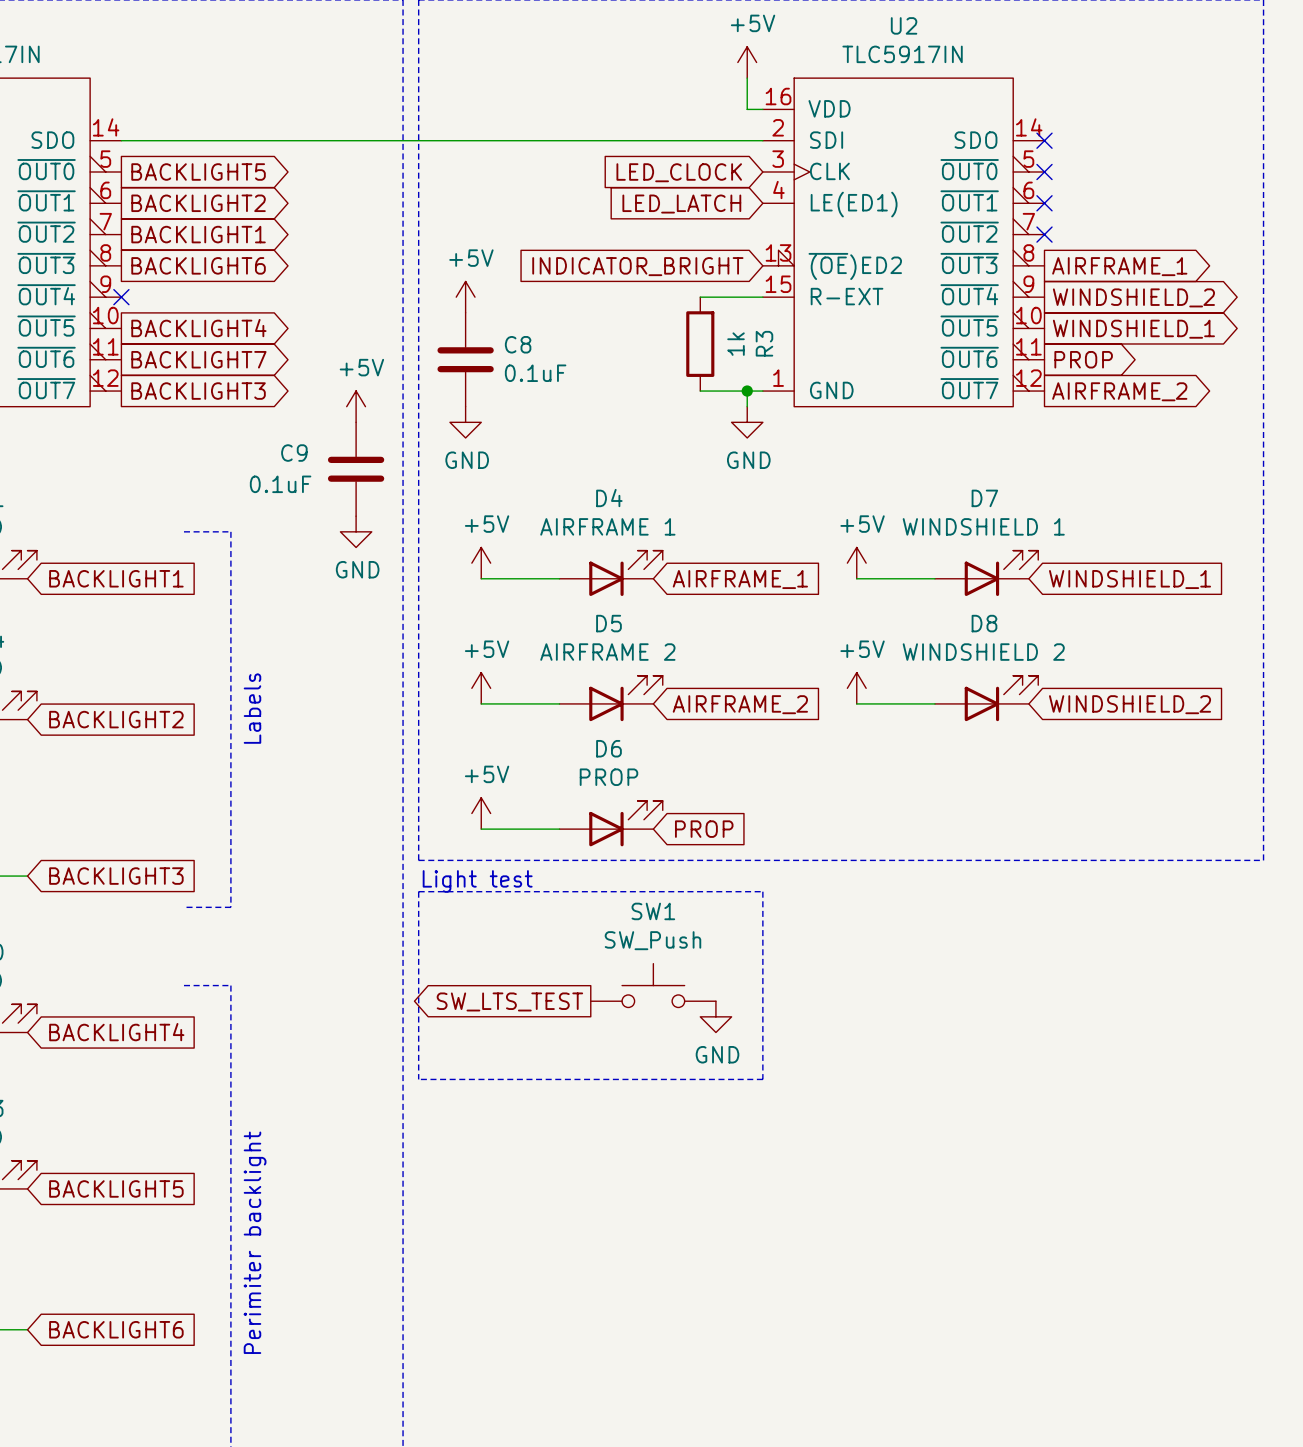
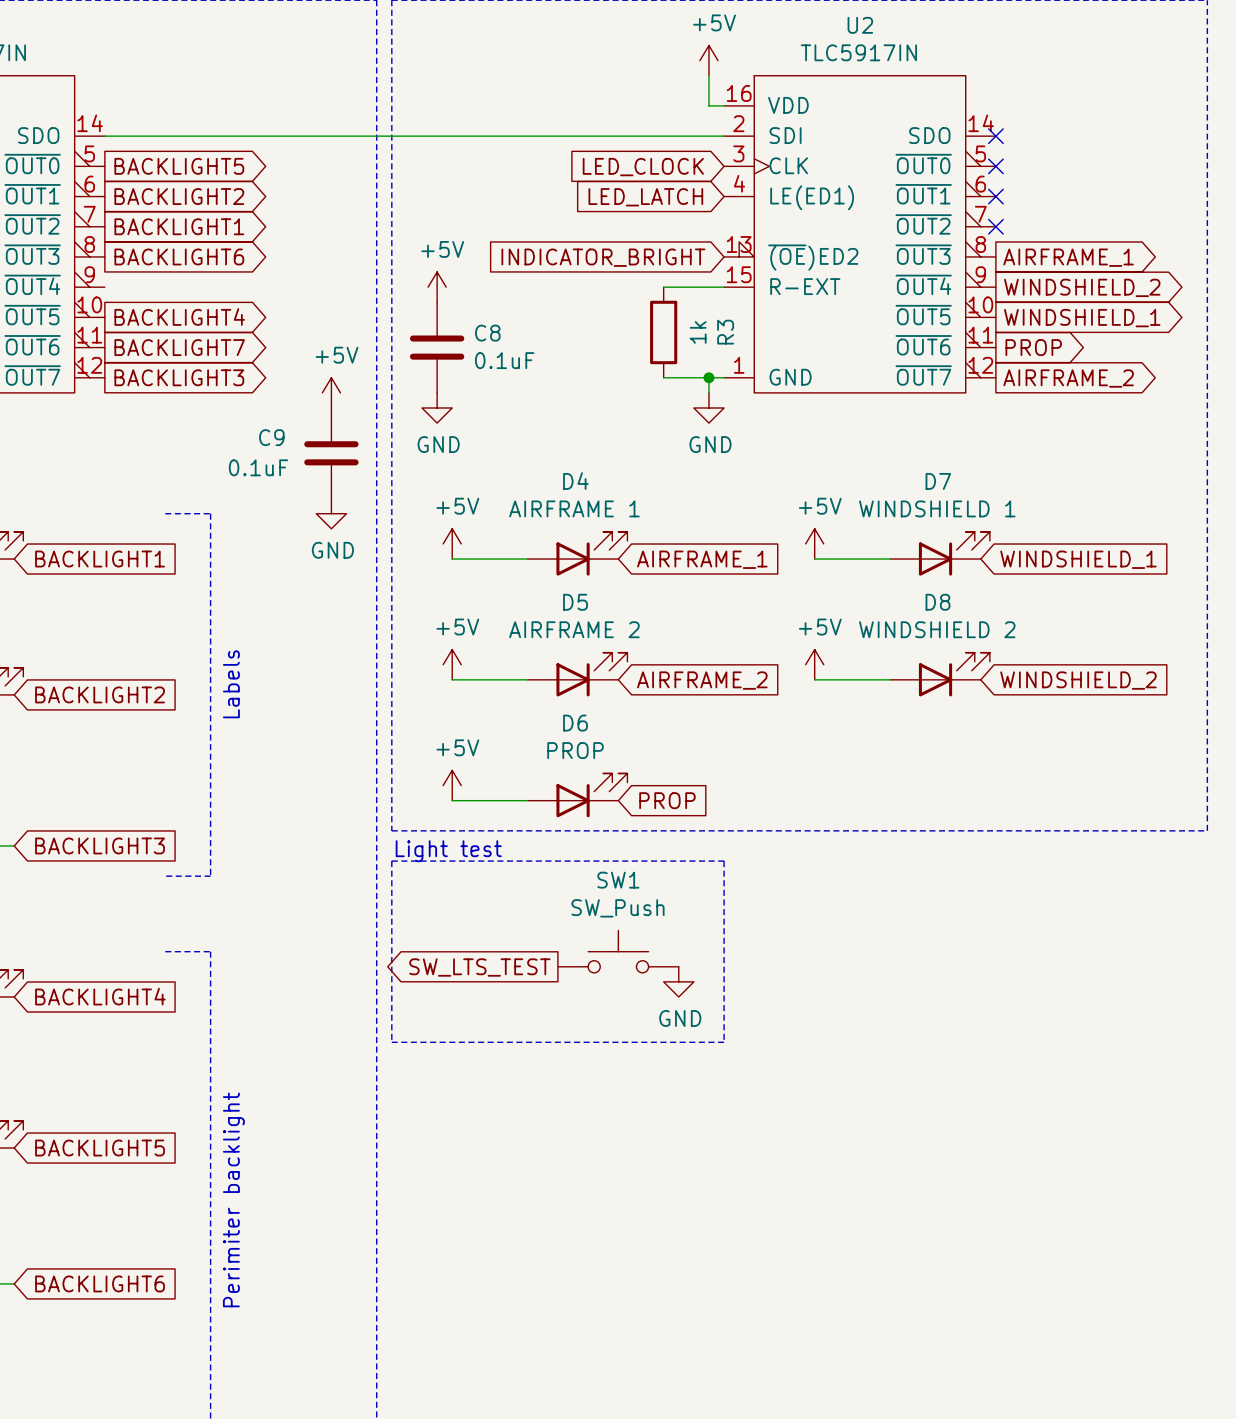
no-connect mark: (121, 297) -> none

